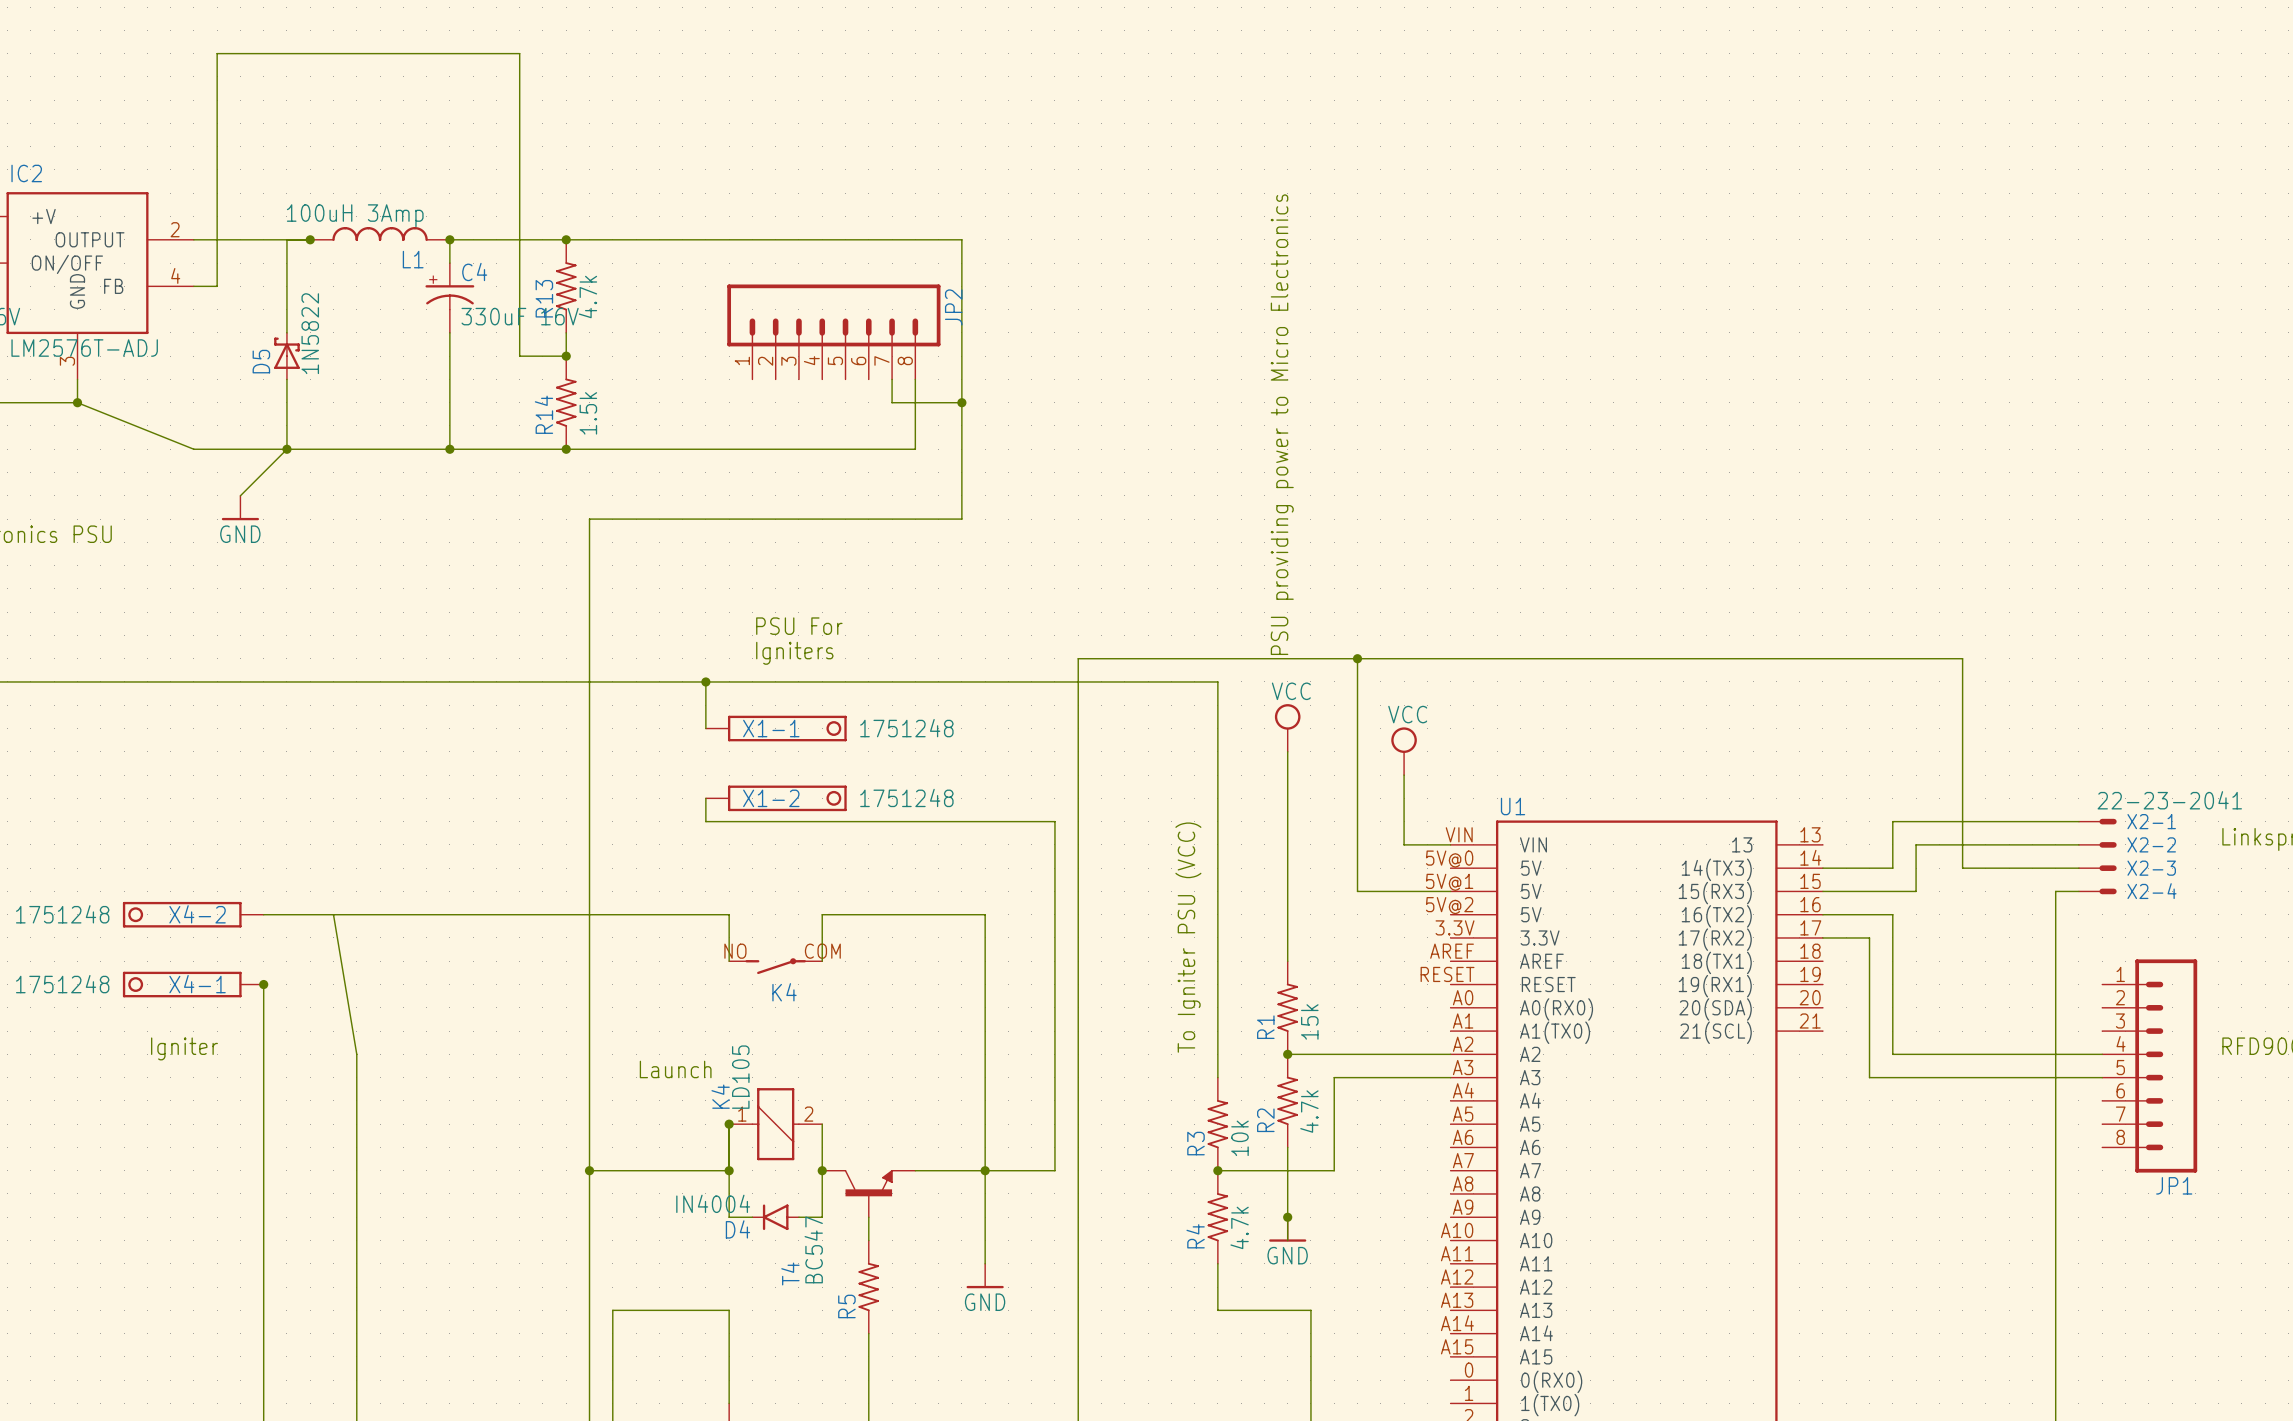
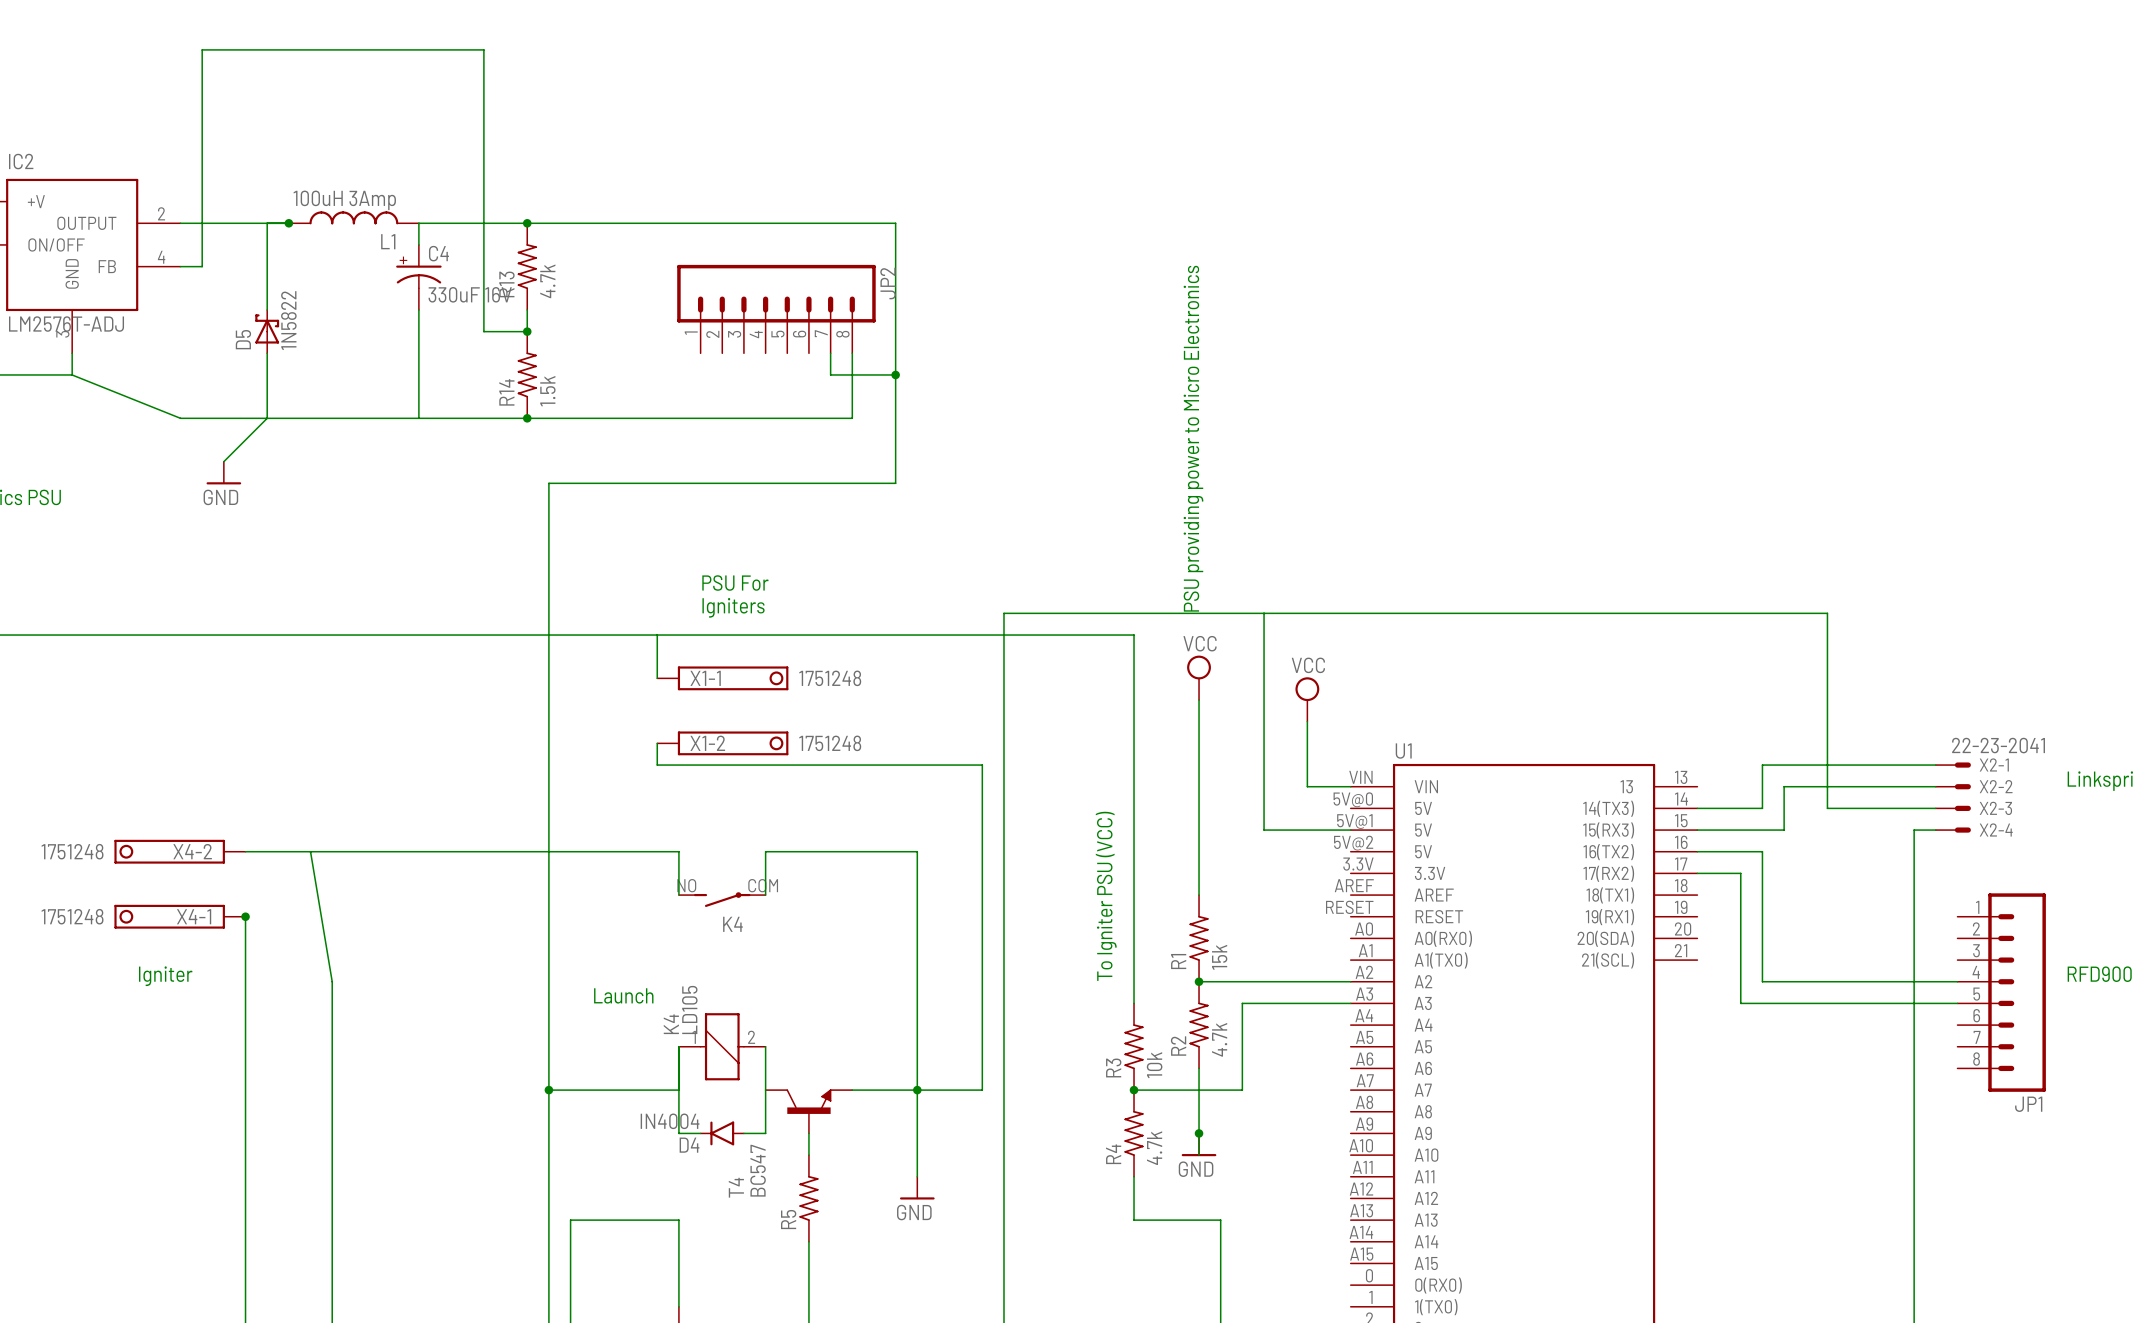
junction: (449, 239) -> none
junction: (77, 402) -> none
junction: (286, 449) -> none
junction: (449, 449) -> none
junction: (1357, 658) -> none
junction: (705, 681) -> none
junction: (729, 1124) -> none
junction: (729, 1170) -> none
junction: (822, 1170) -> none

